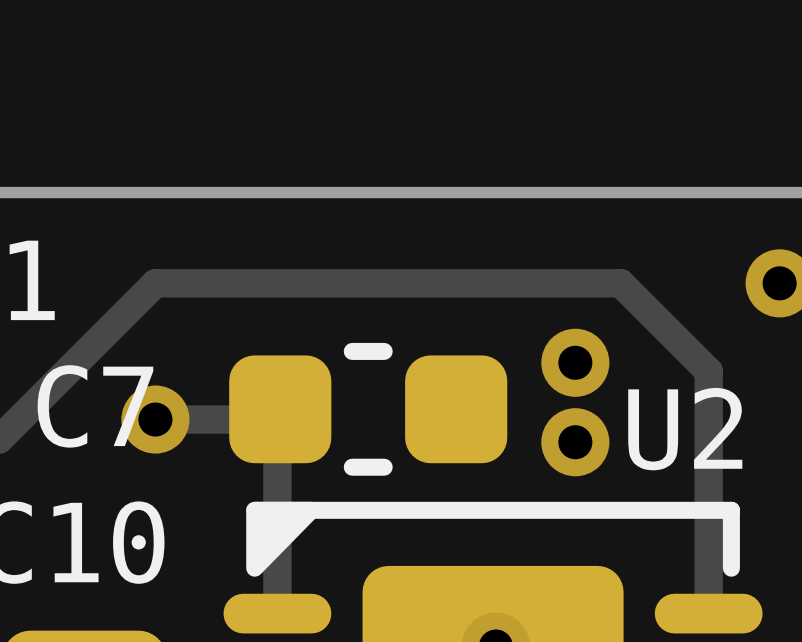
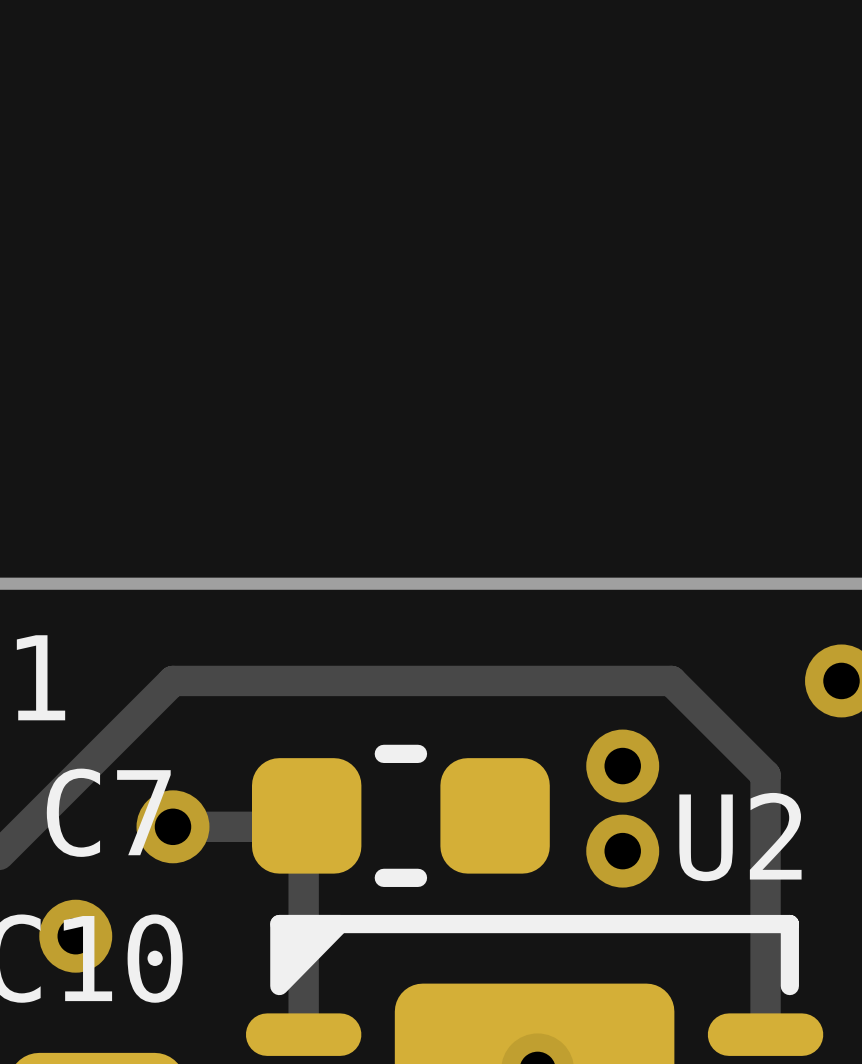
via: none -> (75, 936)

